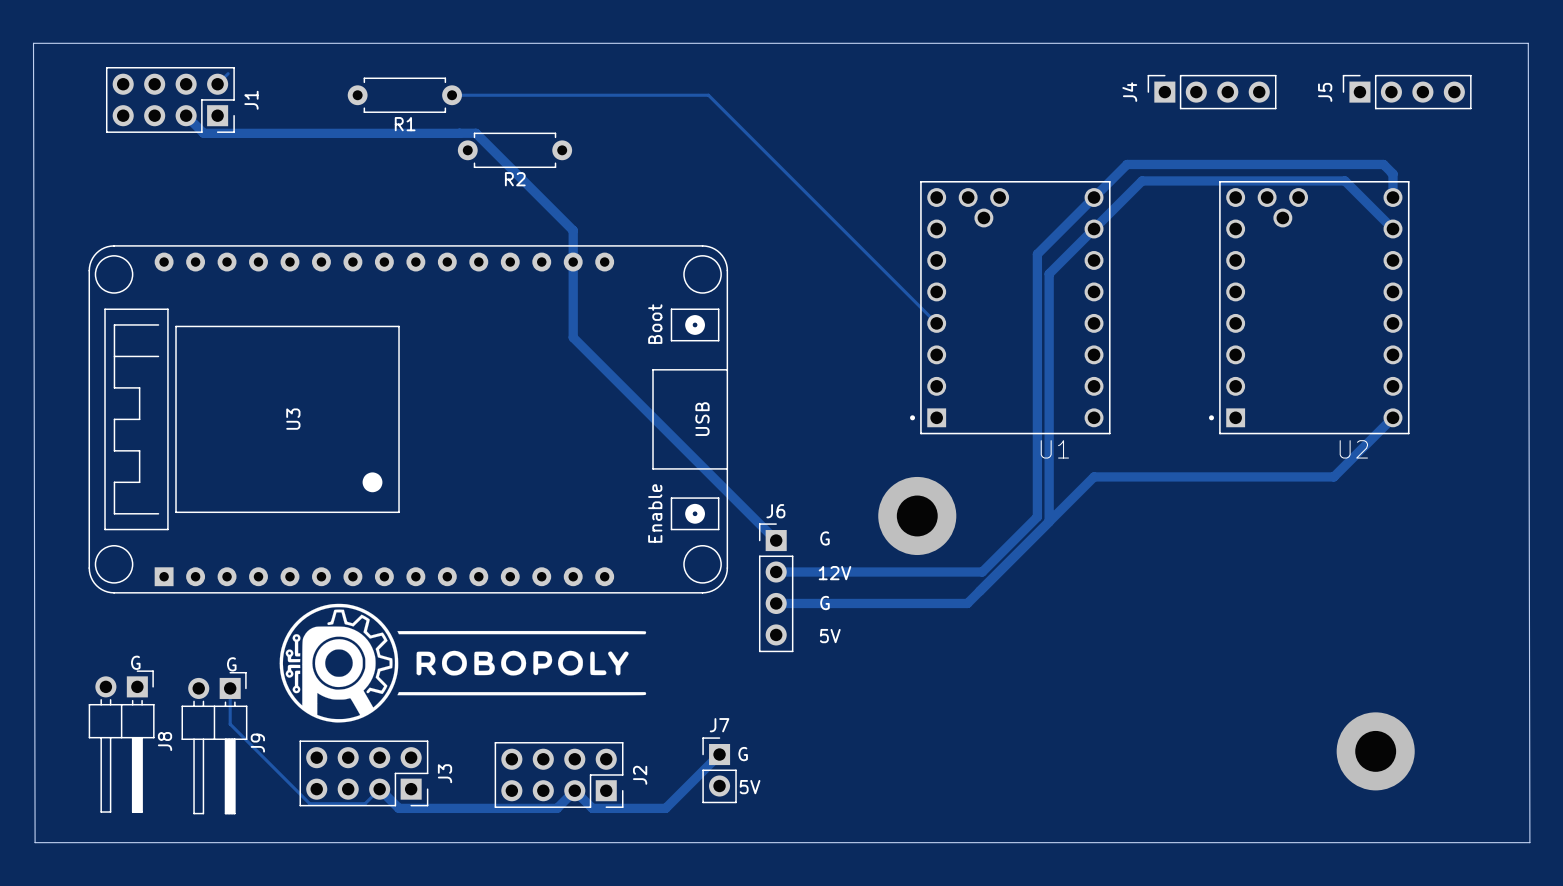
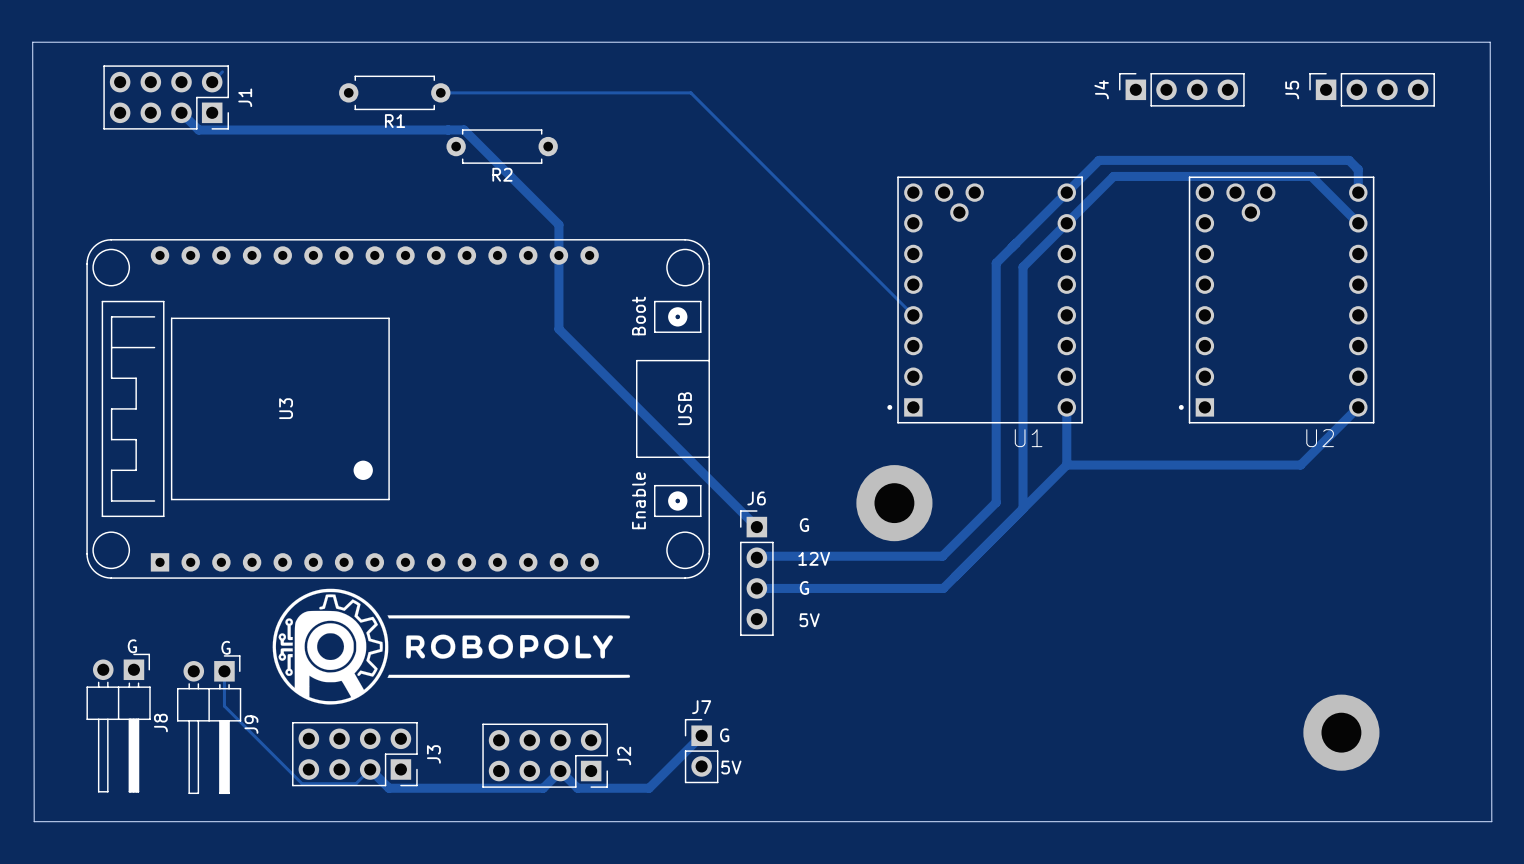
track: (1037, 254) (1037, 516) (982, 572) (776, 572) -> (1011, 247) (996, 263) (996, 502) (942, 556) (758, 556) (756, 557)
track: none -> (1066, 407) (1066, 465)

